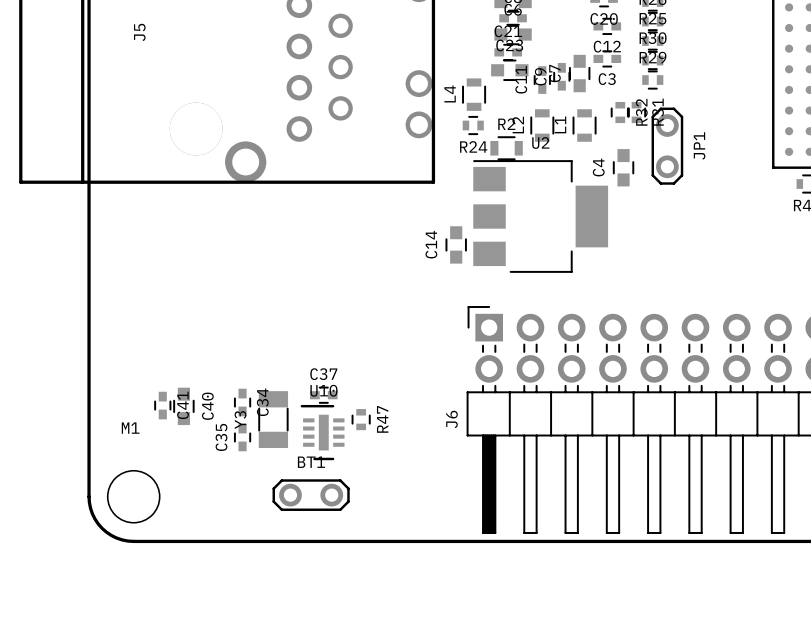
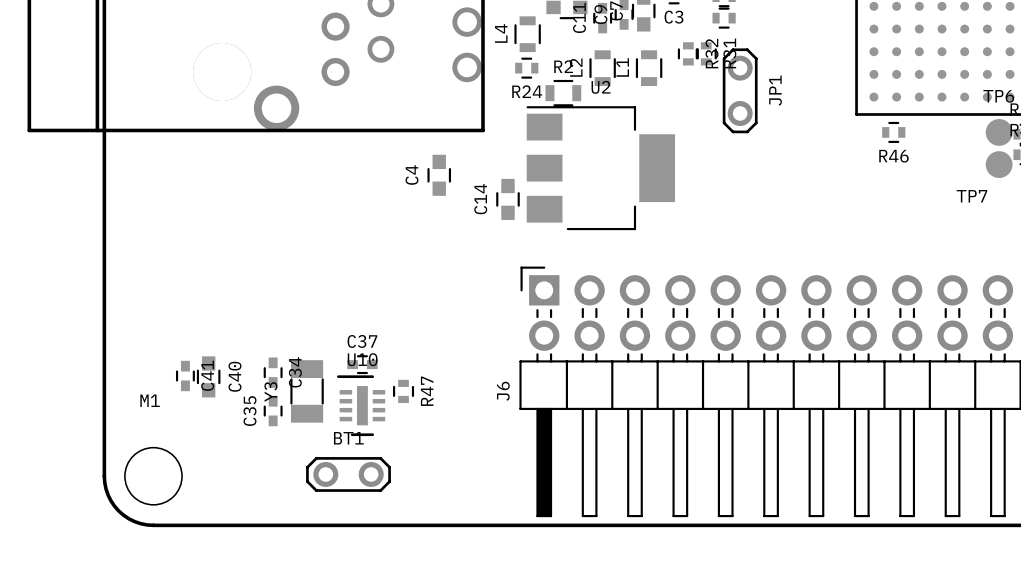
C4 position: (623, 167) -> (439, 175)

